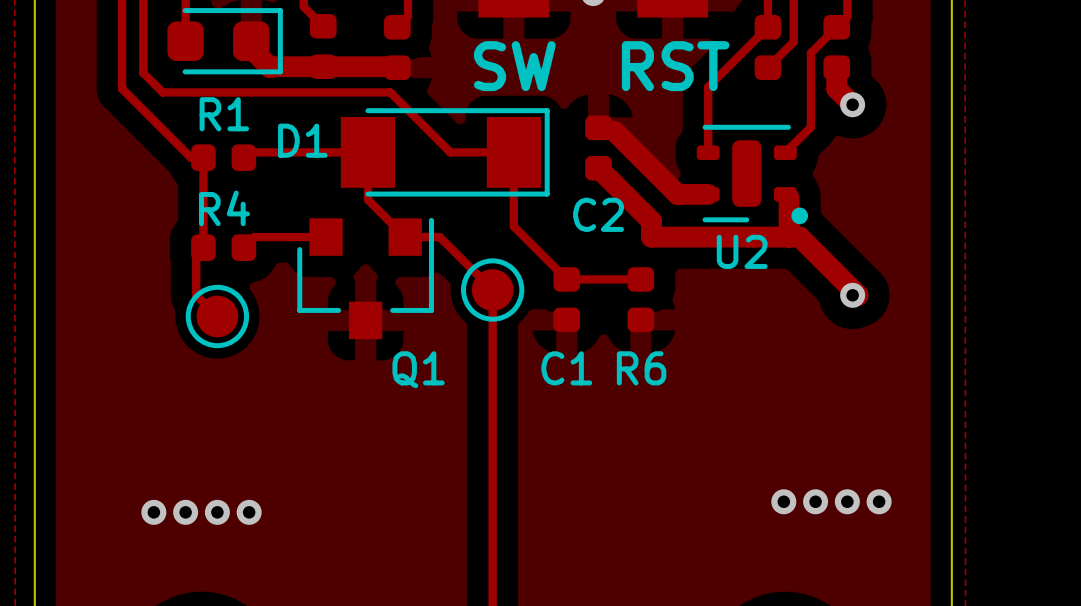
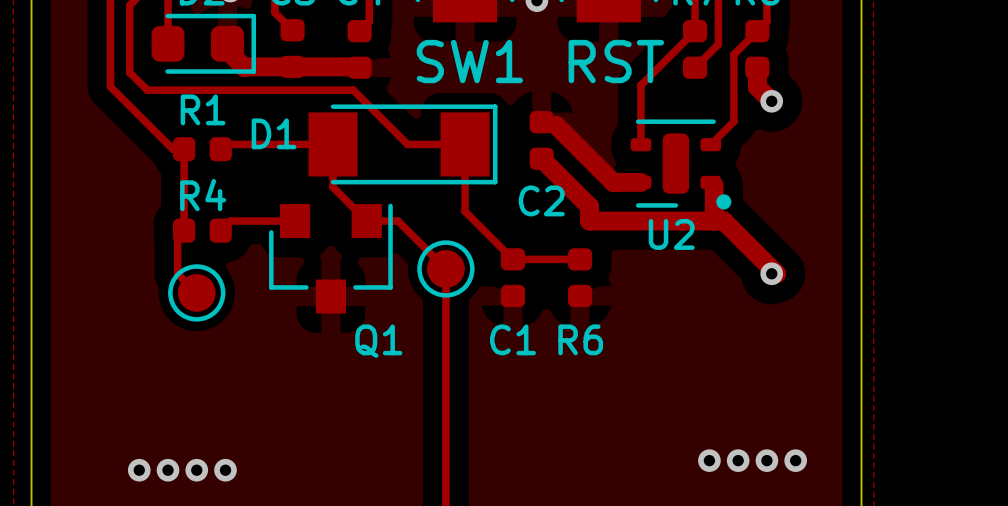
SW1 name: none -> SW1 (469, 61)
RST name: none -> RST (616, 61)
SW1 text: SW (514, 66) -> none
RST text: RST (675, 66) -> none

